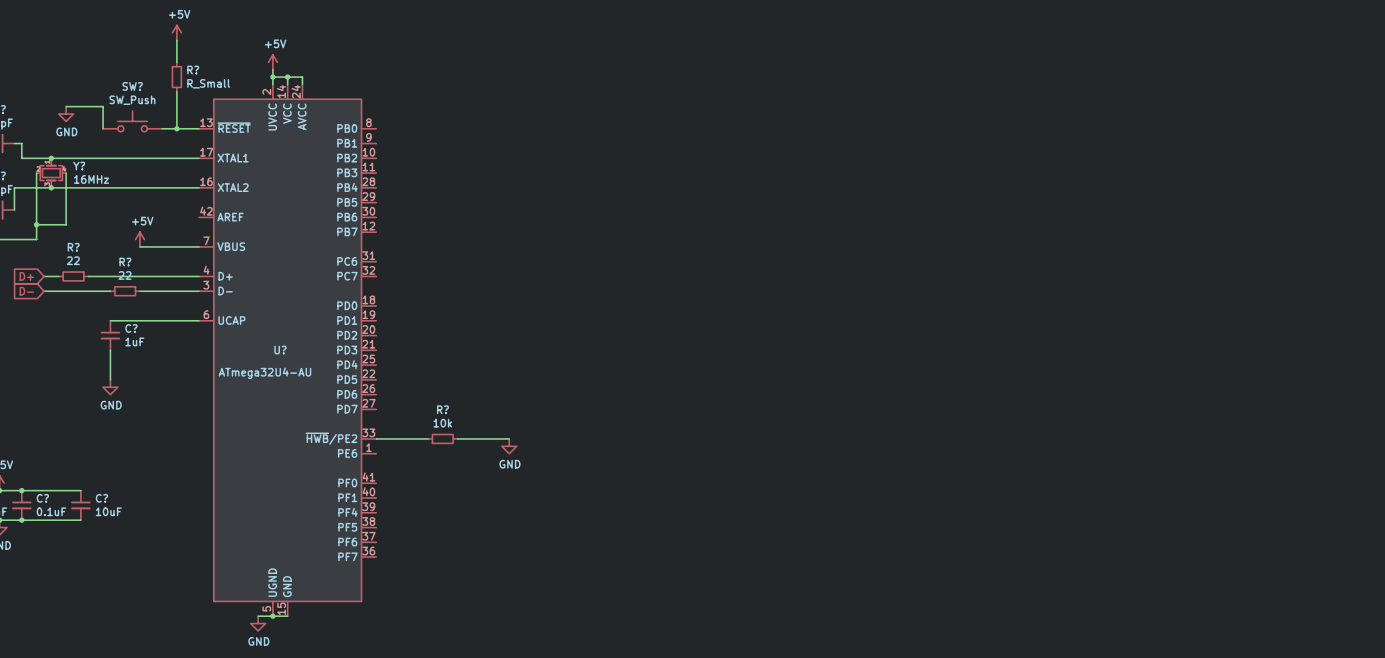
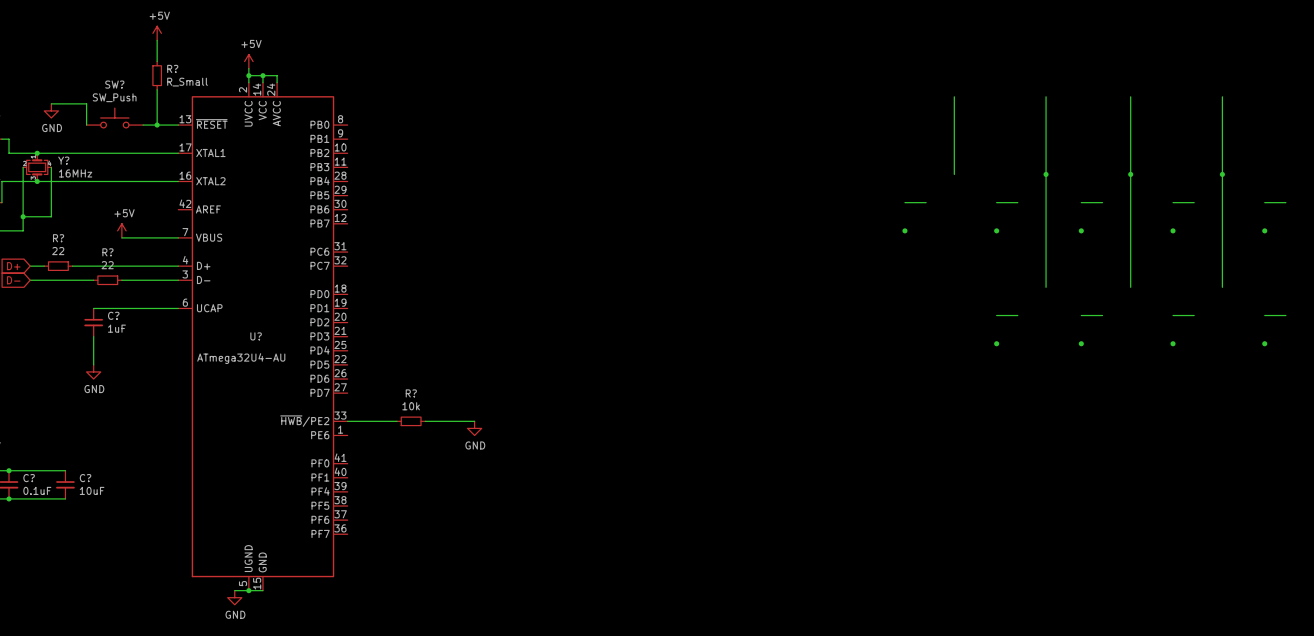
wire: none -> (954, 96) (954, 174)
wire: none -> (1046, 96) (1046, 287)
wire: none -> (1130, 96) (1130, 287)
wire: none -> (1222, 96) (1222, 287)
junction: none -> (1046, 174)
junction: none -> (1130, 174)
junction: none -> (1222, 174)
wire: none -> (904, 202) (926, 202)
wire: none -> (996, 202) (1017, 202)
wire: none -> (1081, 202) (1102, 202)
wire: none -> (1173, 202) (1194, 202)
wire: none -> (1264, 202) (1285, 202)
junction: none -> (904, 230)
junction: none -> (996, 230)
junction: none -> (1081, 230)
junction: none -> (1173, 230)
junction: none -> (1264, 230)
wire: none -> (996, 315) (1017, 315)
wire: none -> (1081, 315) (1102, 315)
wire: none -> (1173, 315) (1194, 315)
wire: none -> (1264, 315) (1285, 315)
junction: none -> (996, 343)
junction: none -> (1081, 343)
junction: none -> (1173, 343)
junction: none -> (1264, 343)

